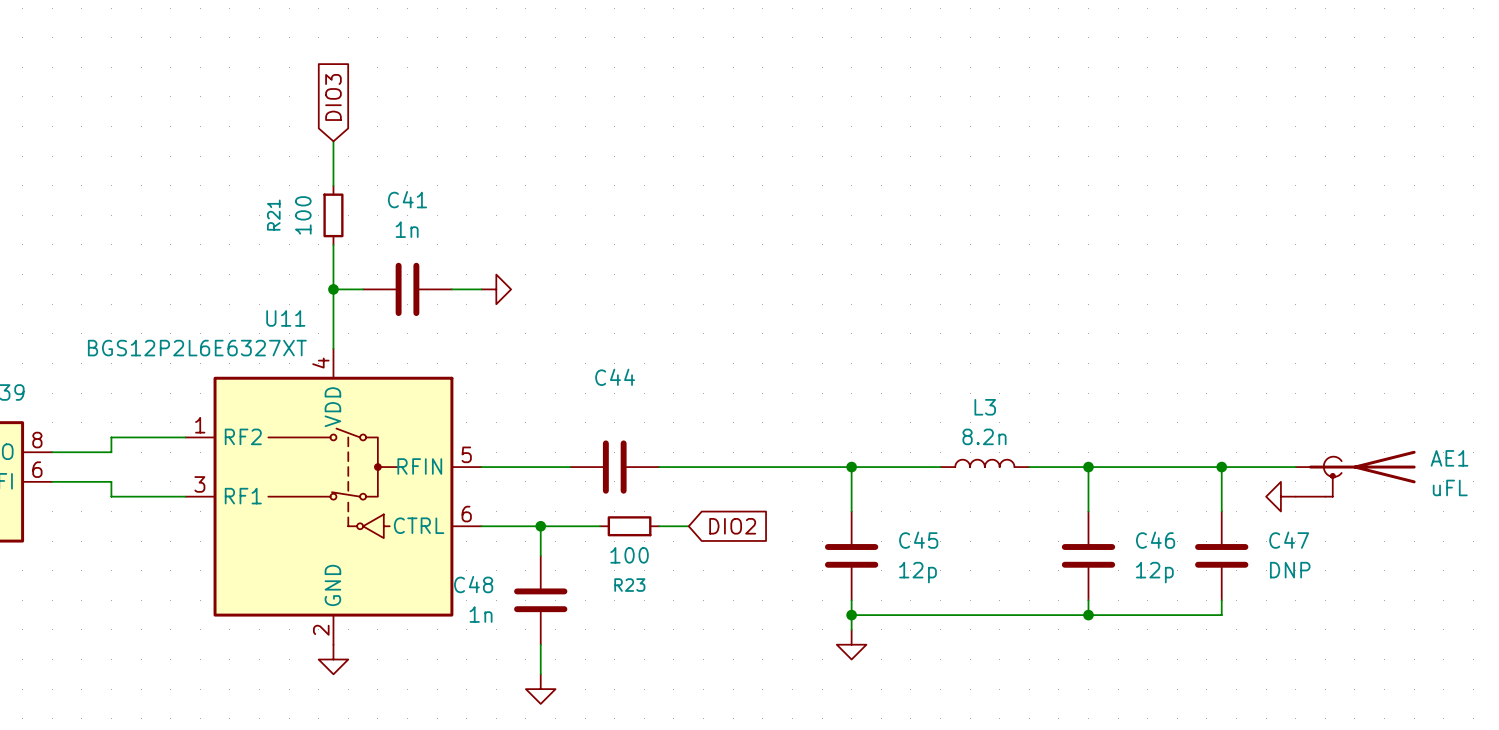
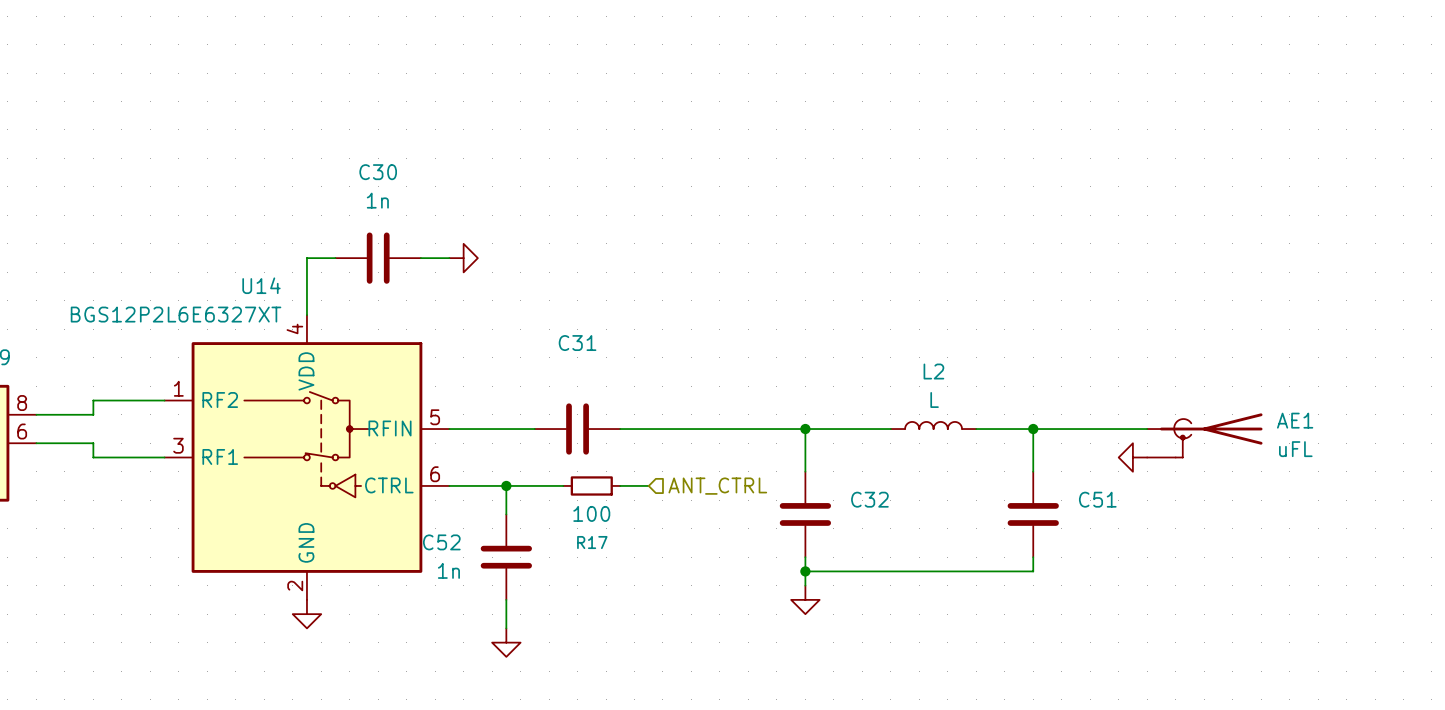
global label: DIO3 (333, 97) -> none
wire: (333, 141) (333, 185) -> none
C41 name: C41 (407, 199) -> C30 (378, 172)
R21: 100 (333, 215) -> none
wire: (333, 244) (333, 289) -> none
junction: (333, 289) -> none
U11 name: U11 (285, 318) -> U14 (261, 285)
C44 name: C44 (615, 377) -> C31 (577, 343)
L3 name: L3 (985, 407) -> L2 (933, 371)
L3 value: 8.2n (984, 436) -> L (934, 400)
wire: (1221, 467) (1221, 511) -> none
junction: (1221, 467) -> none
AE1 position: (1355, 473) -> (1204, 435)
power symbol position: (1280, 496) -> (1132, 457)
global label: DIO2 (732, 526) -> none
hierarchical label: none -> ANT_CTRL (717, 486)
C45 name: C45 (918, 540) -> C32 (869, 499)
C46 name: C46 (1155, 540) -> C51 (1097, 499)
C47: DNP (1221, 555) -> none
C45 value: 12p (918, 572) -> none
C46 value: 12p (1154, 572) -> none
C48 name: C48 (473, 584) -> C52 (441, 542)
R23 name: R23 (629, 585) -> R17 (592, 542)
wire: (1221, 600) (1221, 615) (1088, 615) -> none
junction: (1088, 615) -> none

